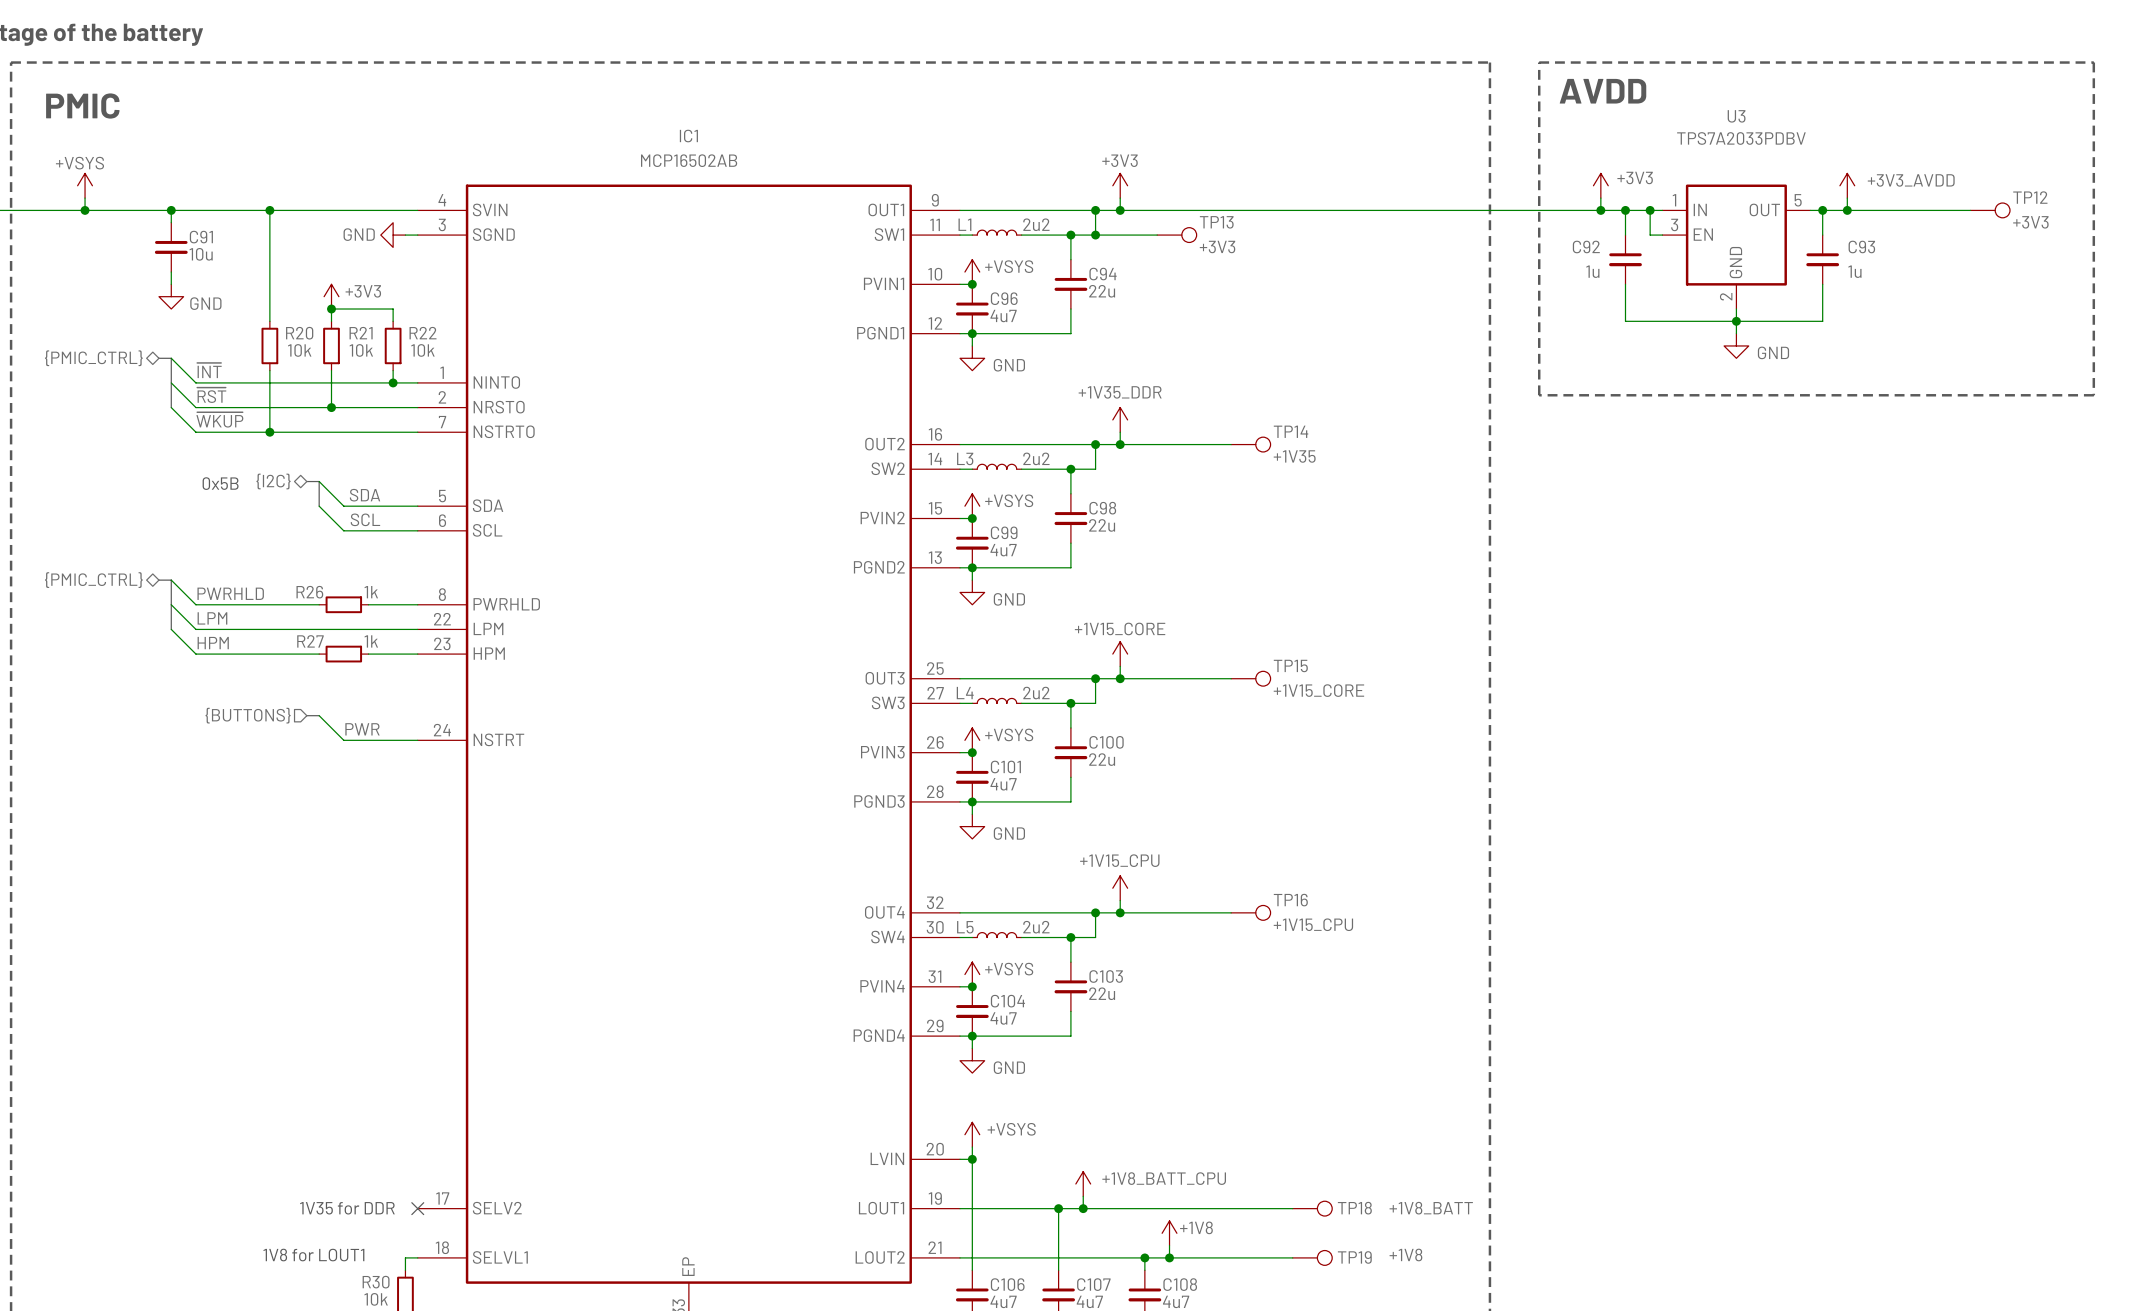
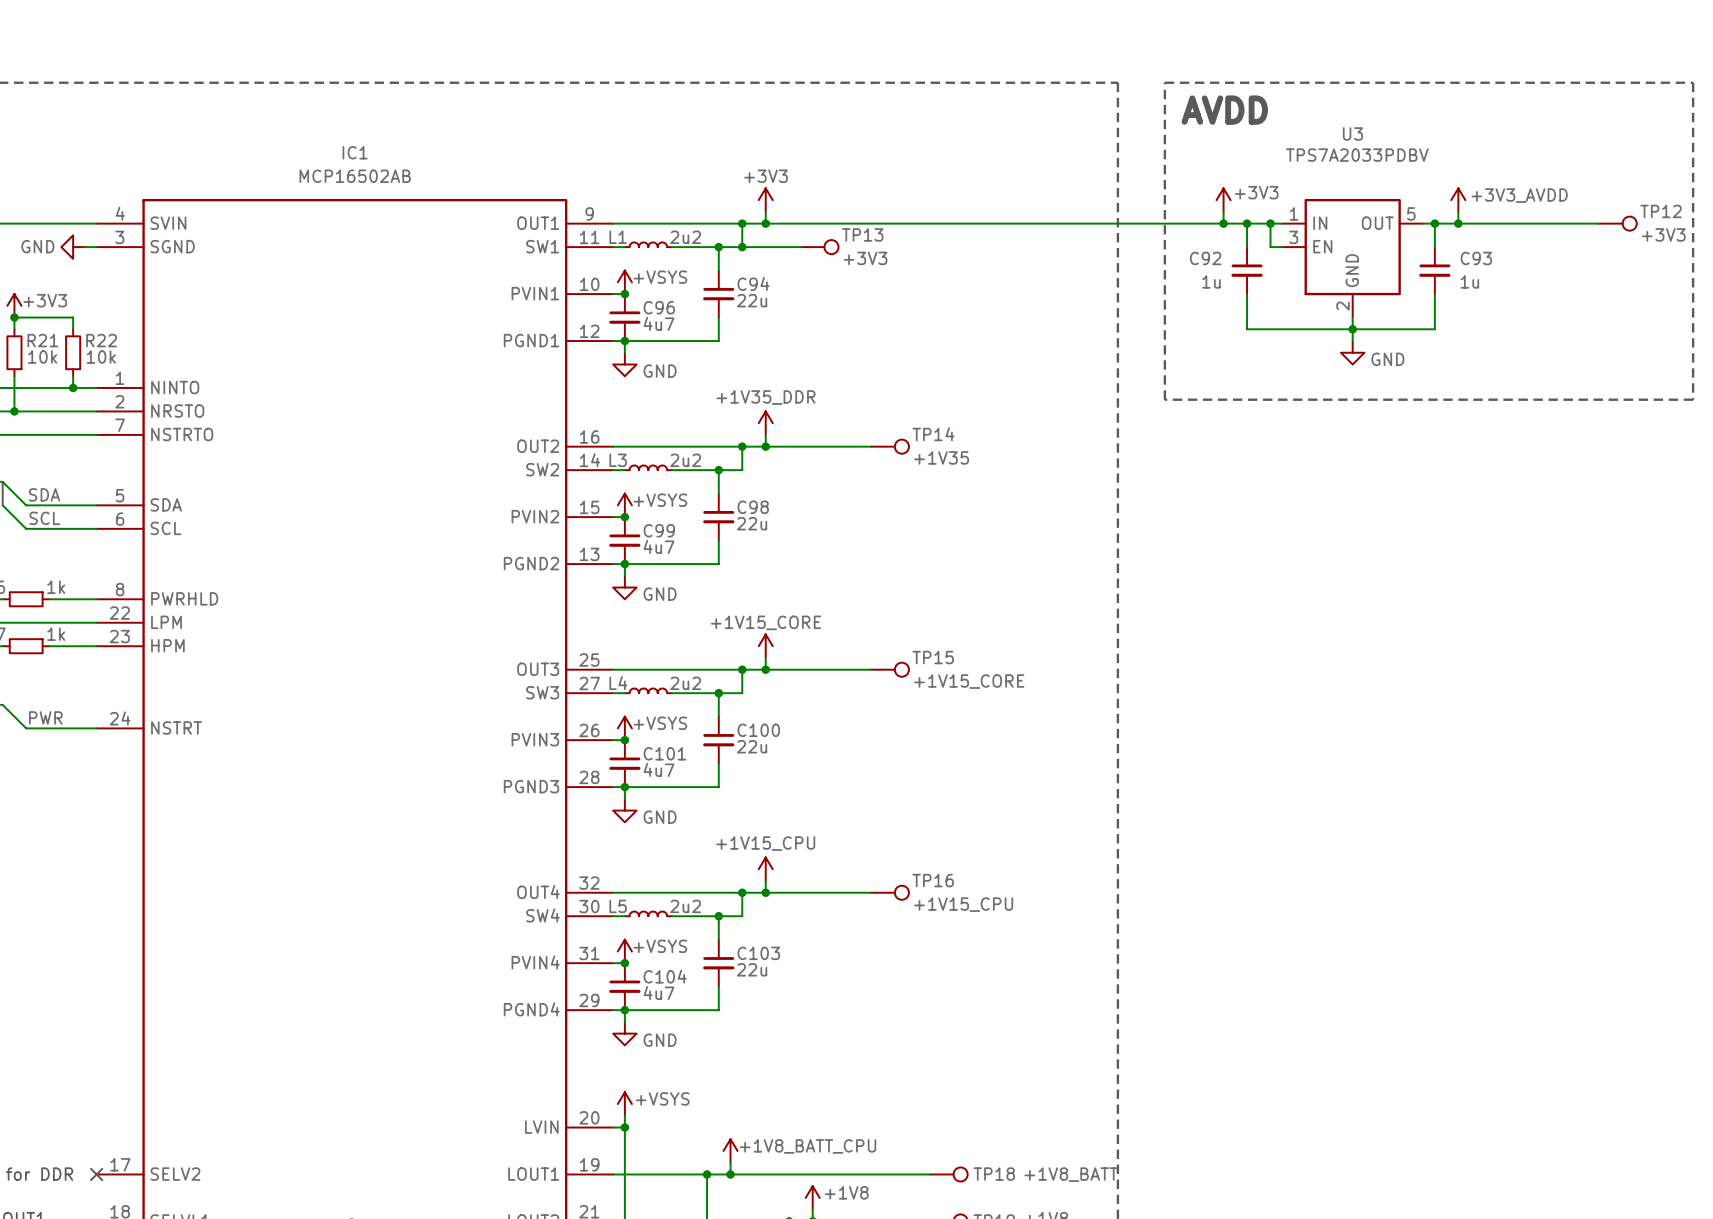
TP12 position: (1990, 210) -> (1617, 223)

